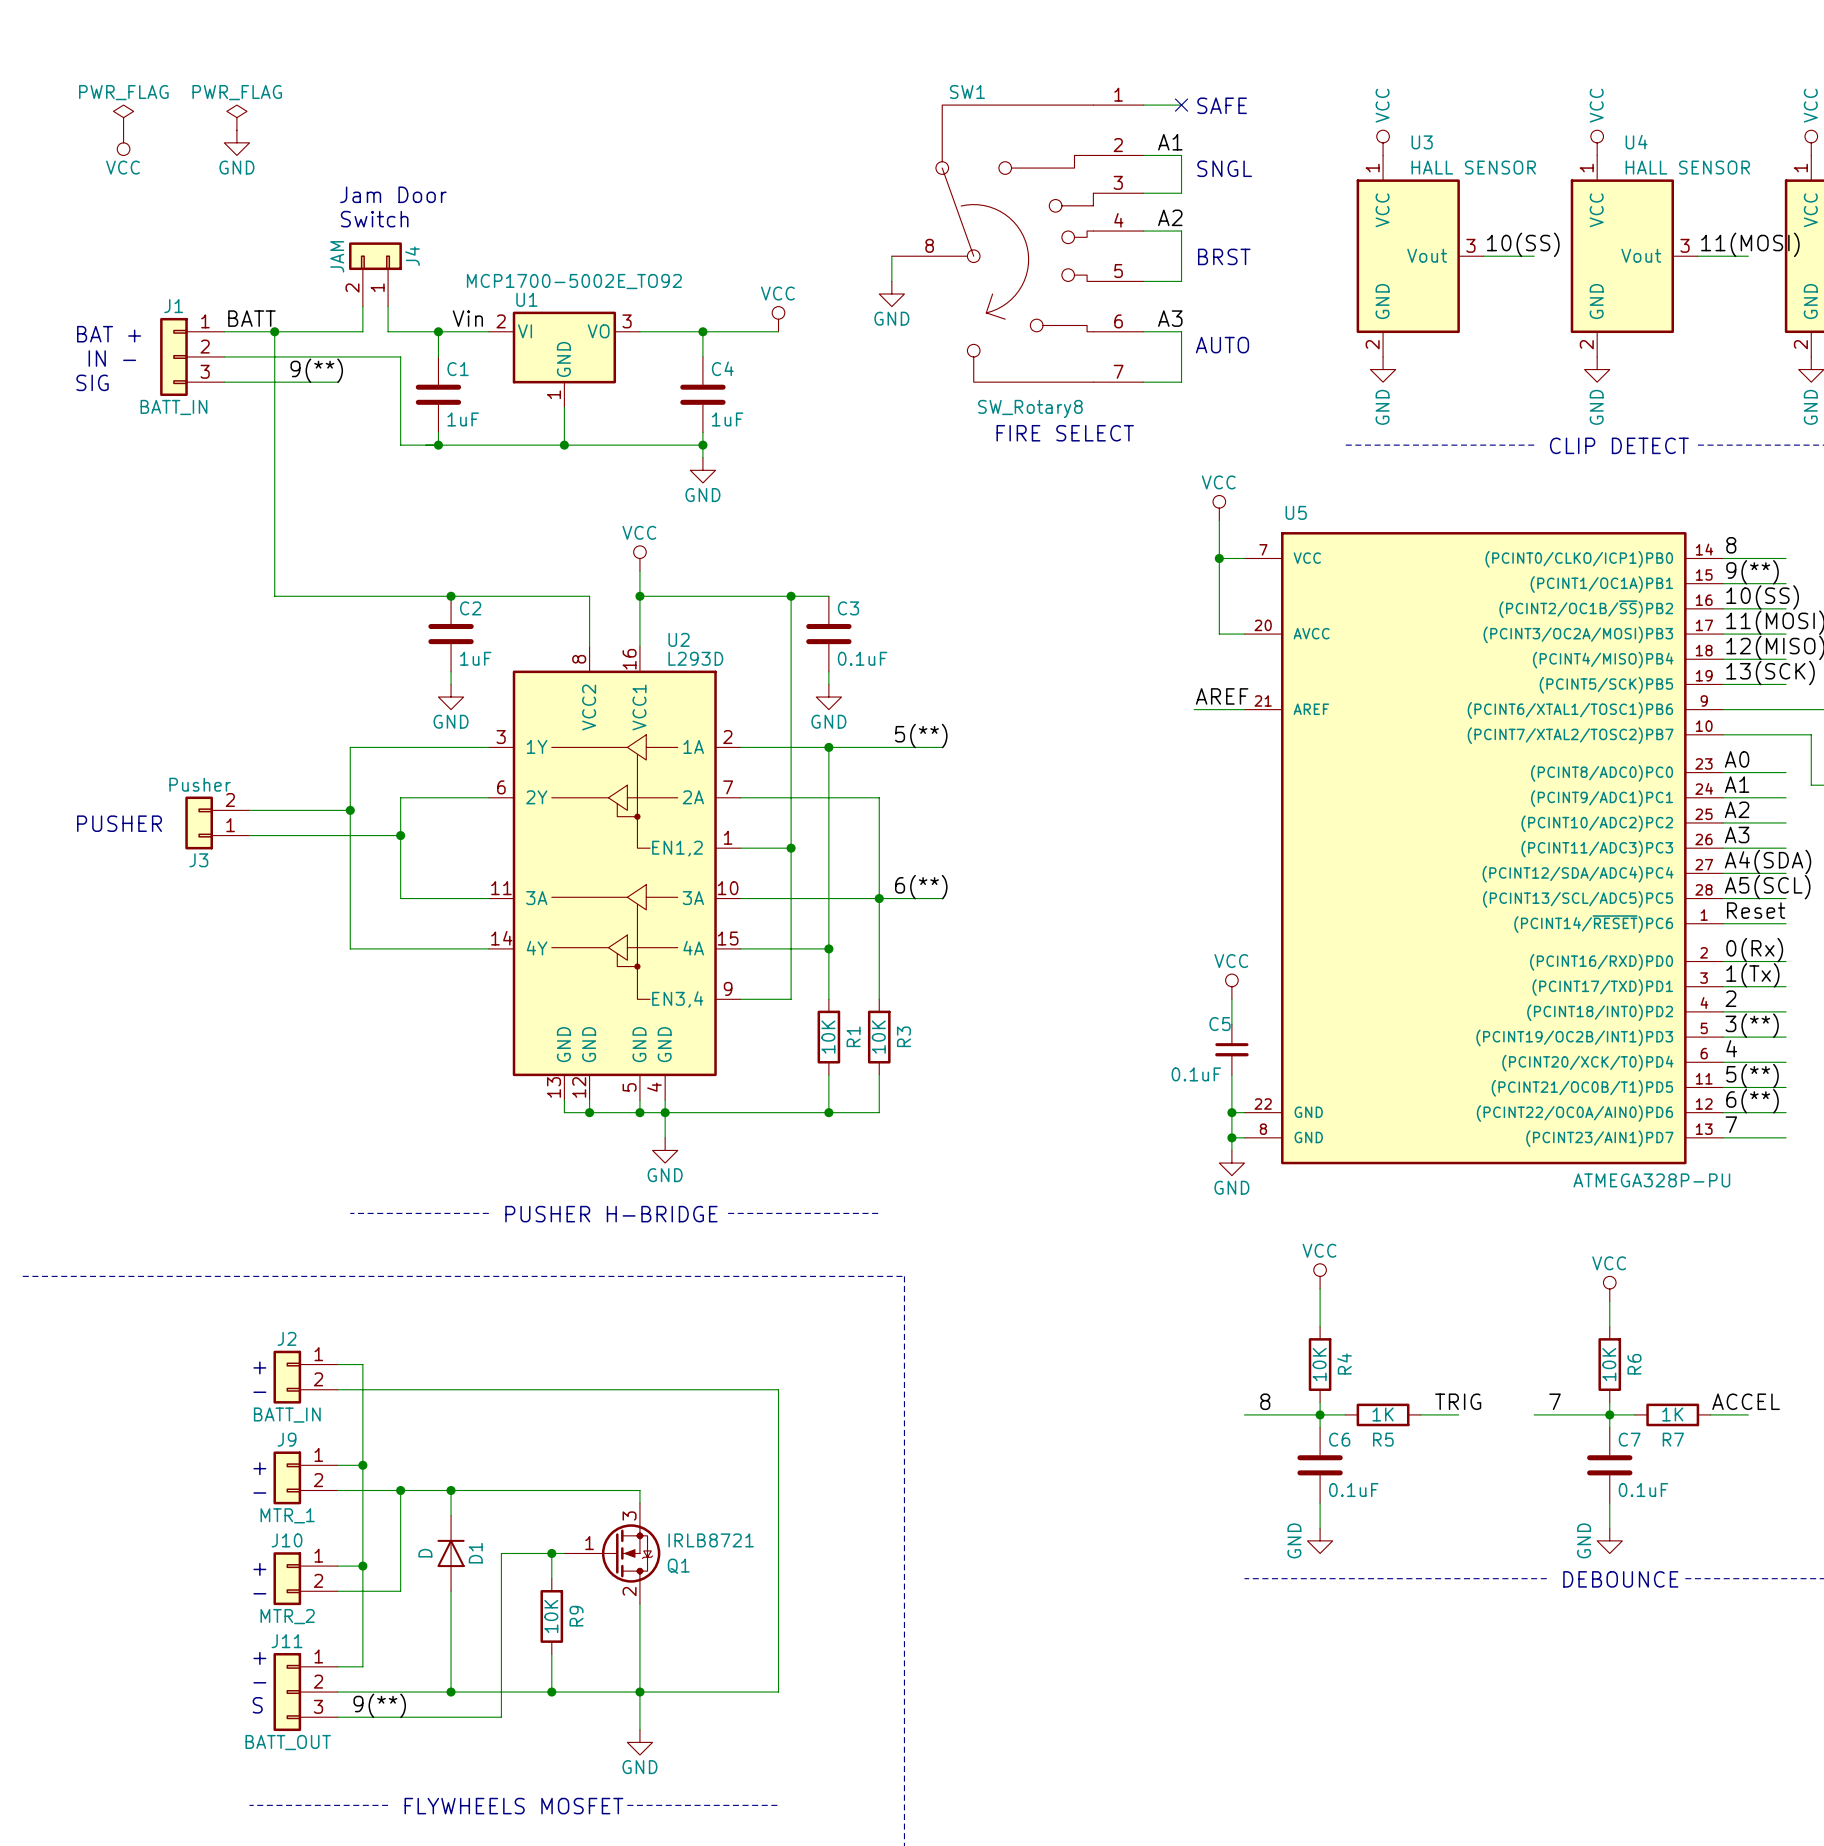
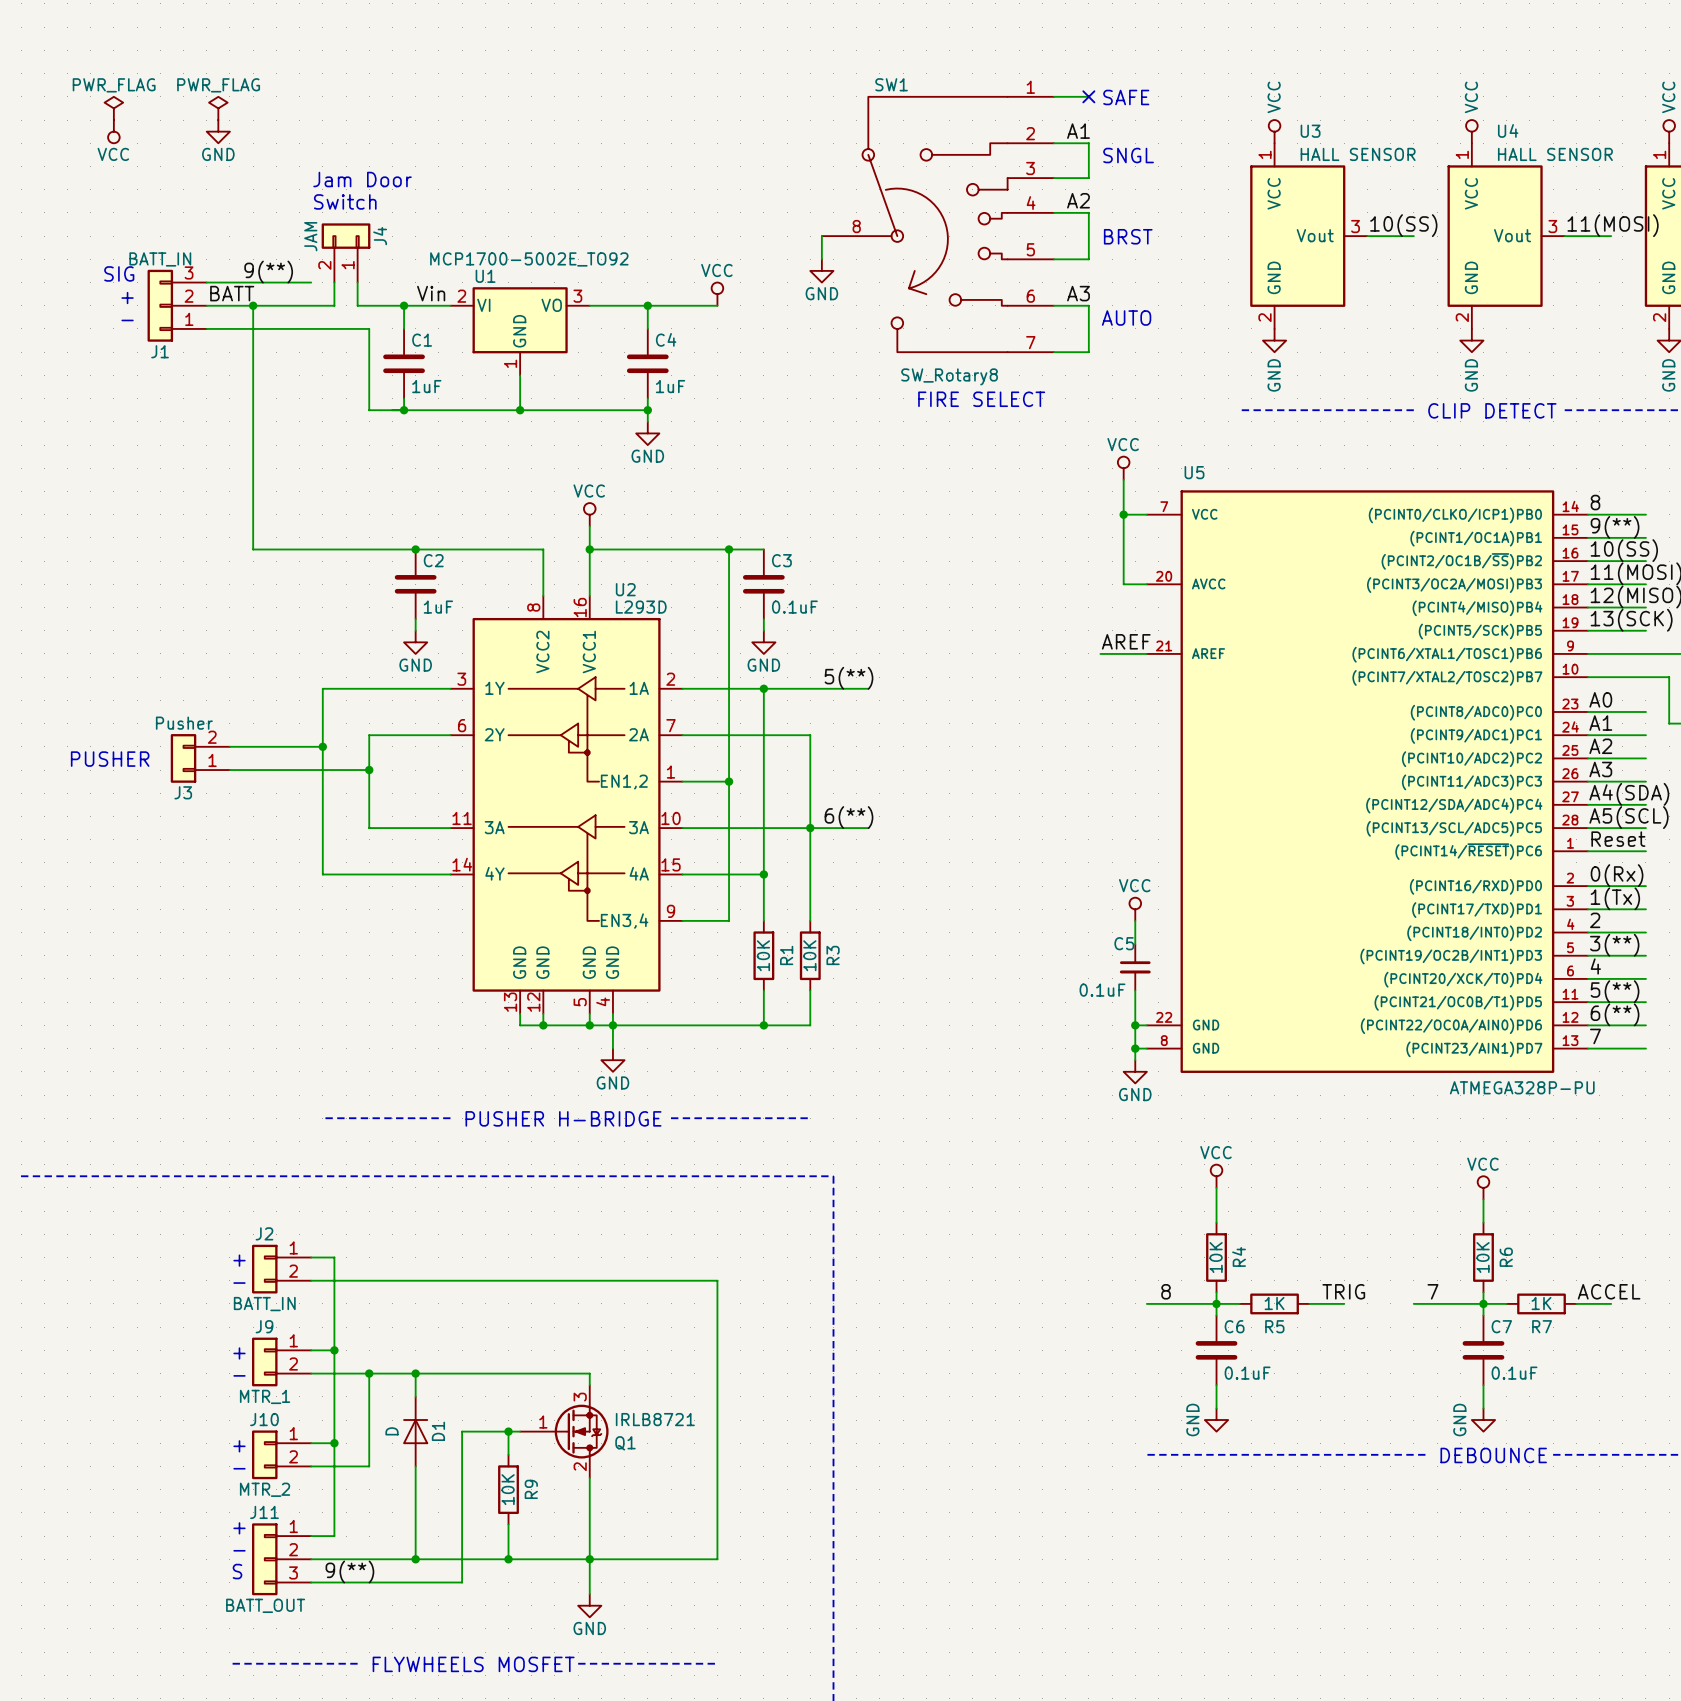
text: none -> + (127, 298)
text: BAT + (109, 334) -> none
text: none -> - (127, 320)
J1 flip: as is (173, 356) -> up-down (160, 305)
text: IN - (112, 358) -> none
label position: 9(**) (316, 370) -> 9(**) (268, 272)
text position: SIG (92, 382) -> SIG (119, 273)
wire: (224, 382) (337, 382) -> (206, 282) (311, 282)

